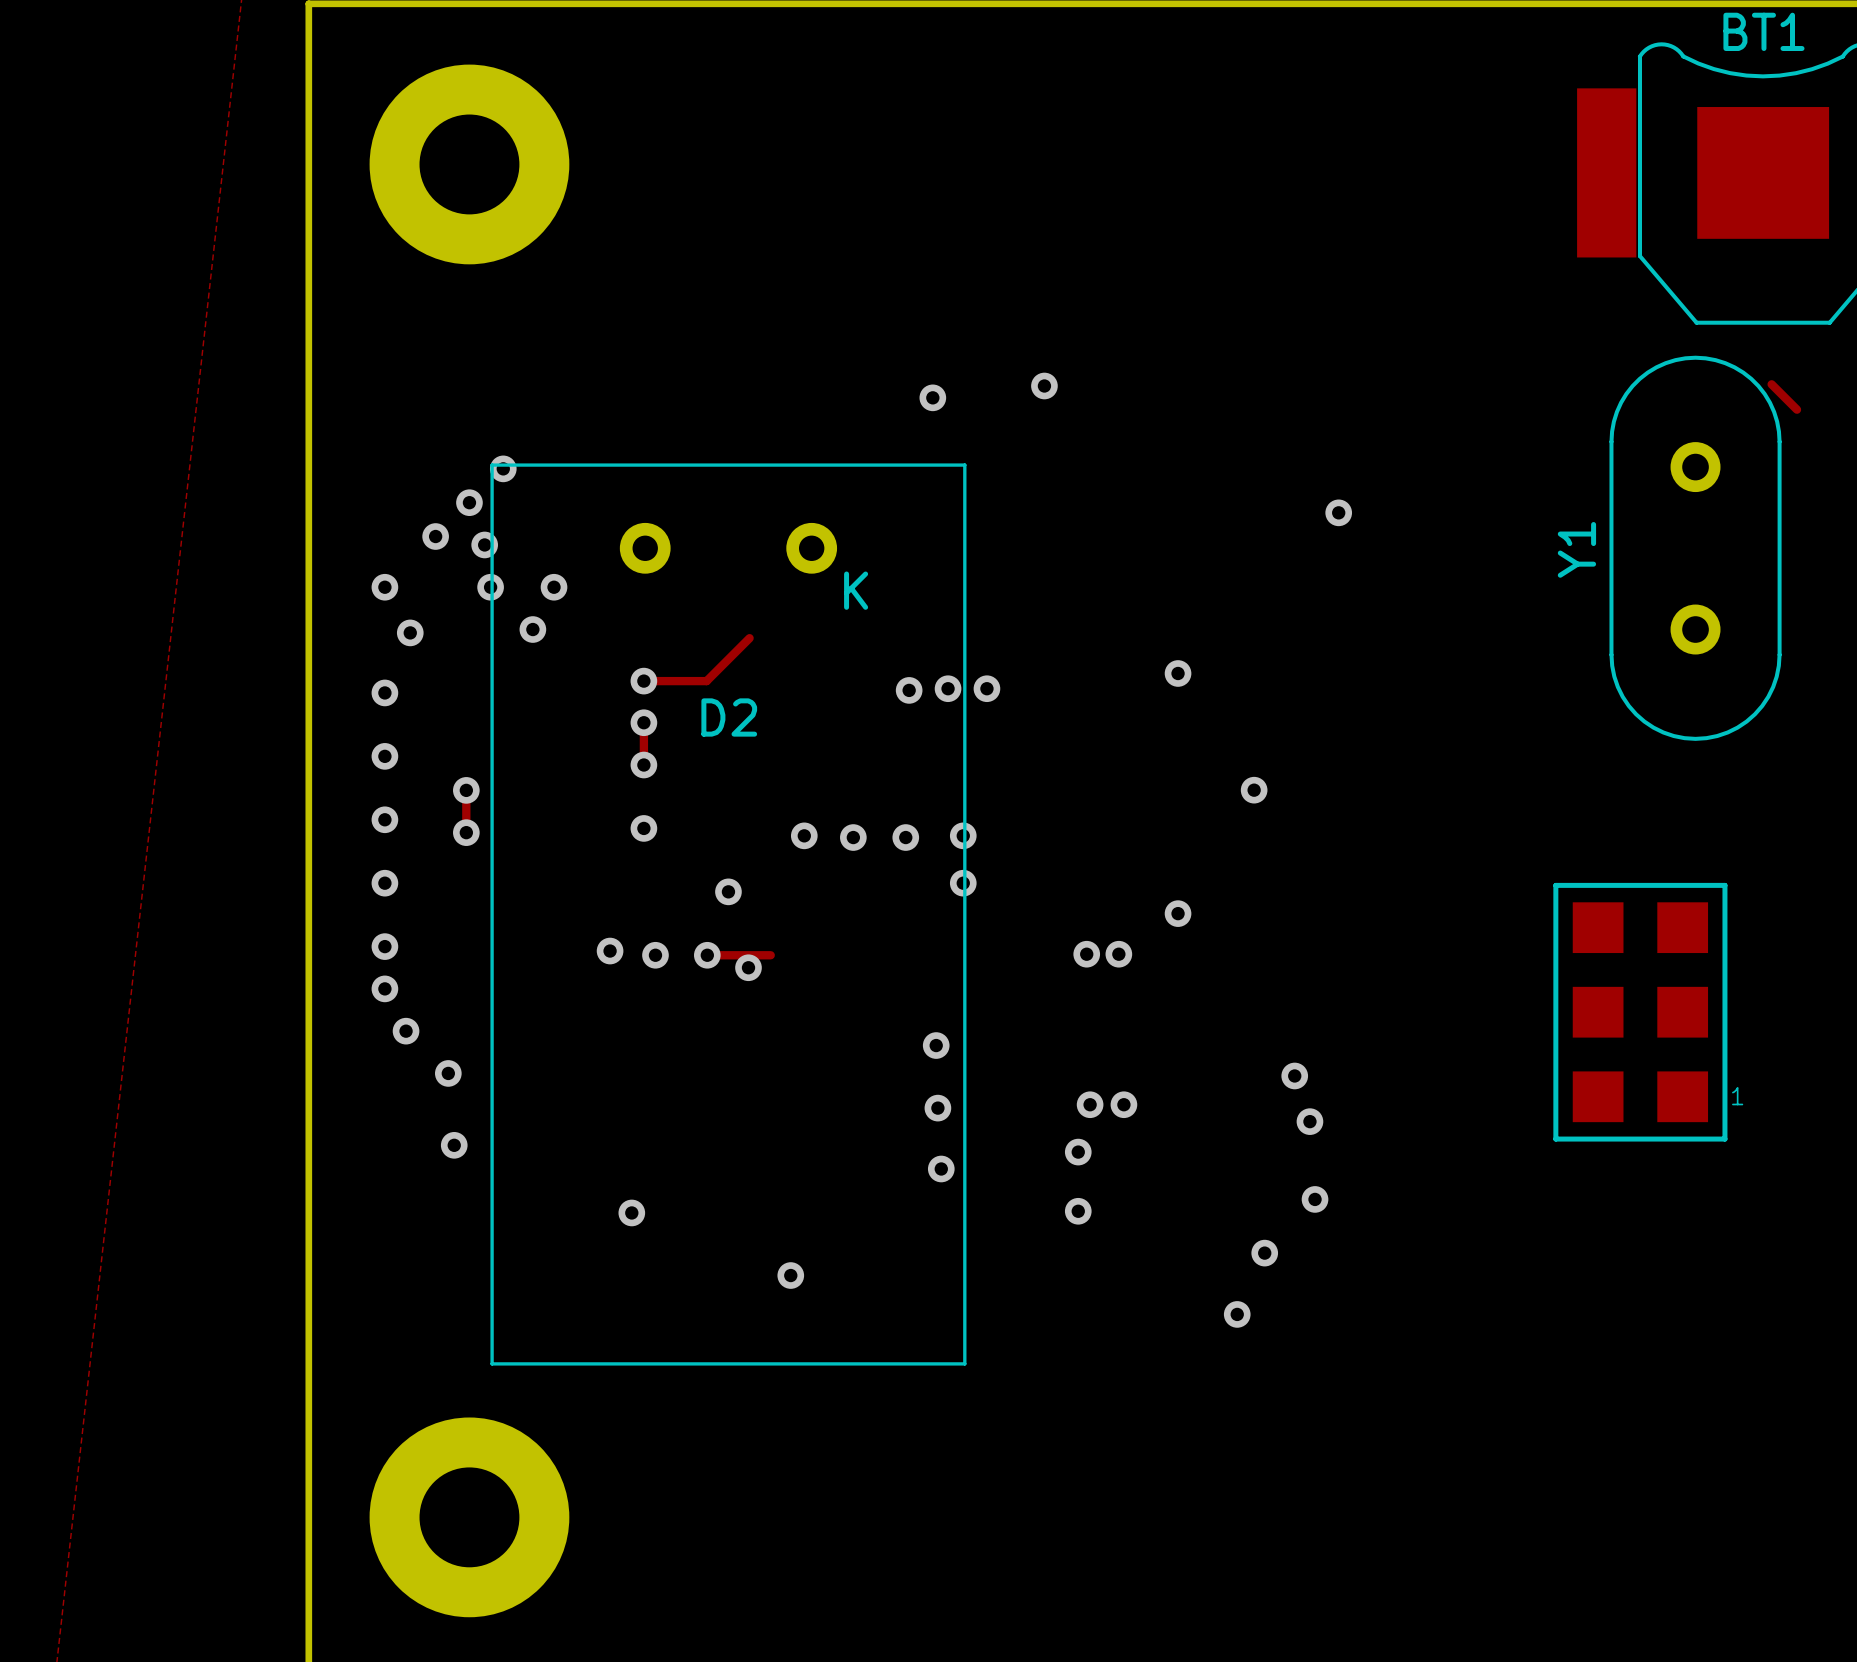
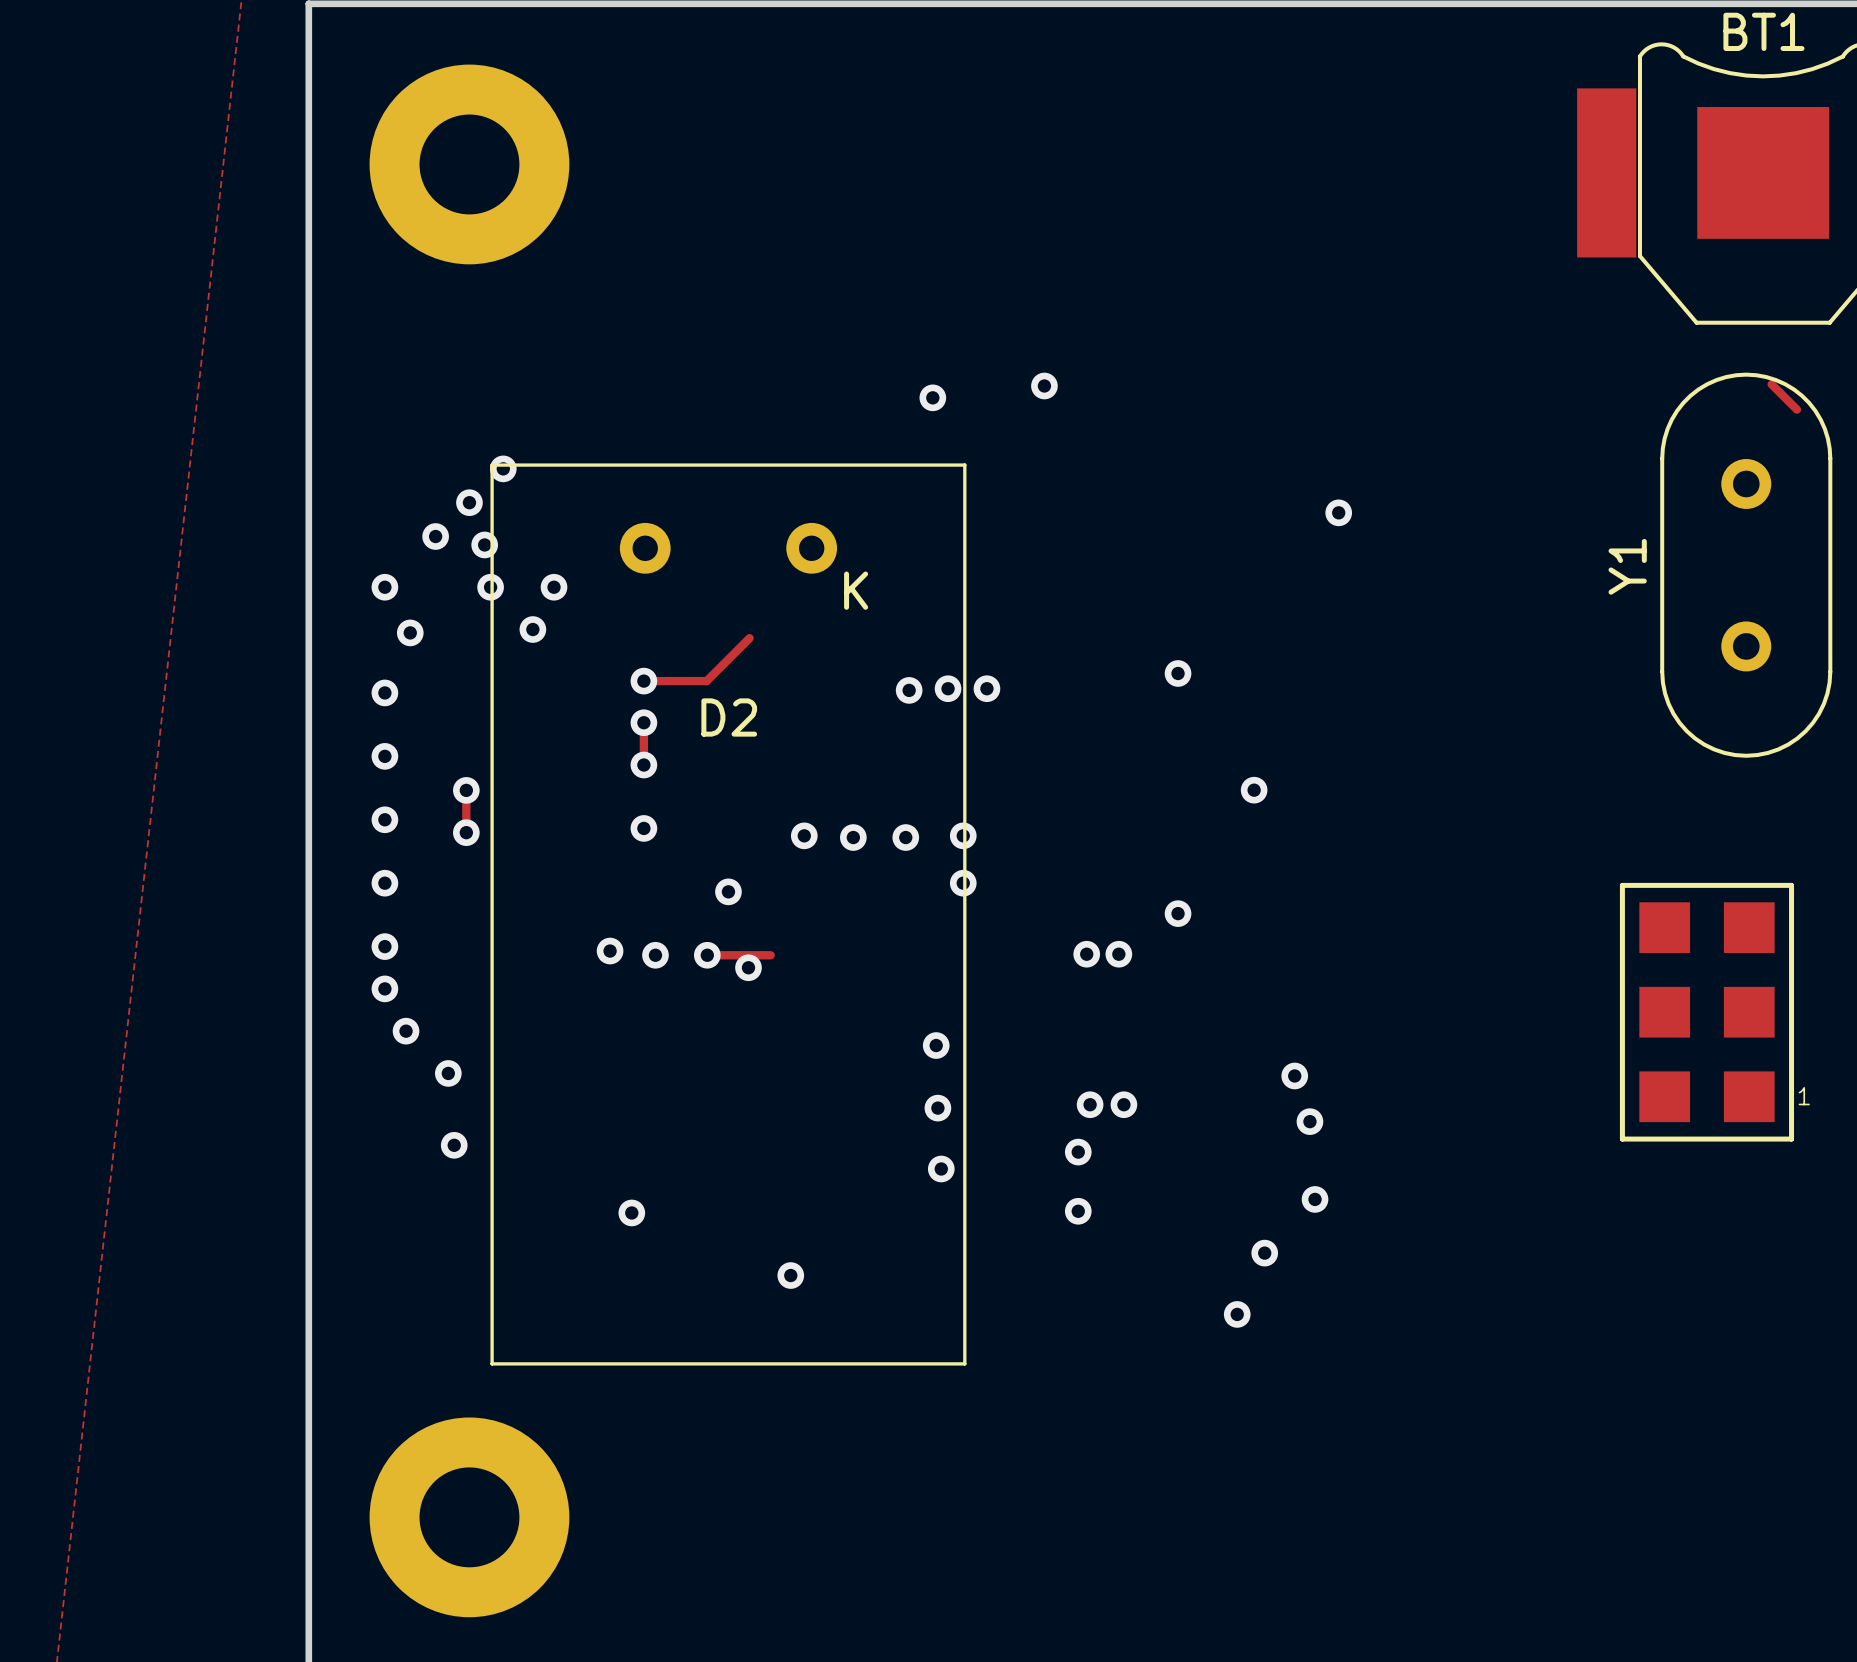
Y1 position: (1695, 548) -> (1746, 565)
part position: (1640, 1012) -> (1706, 1012)

